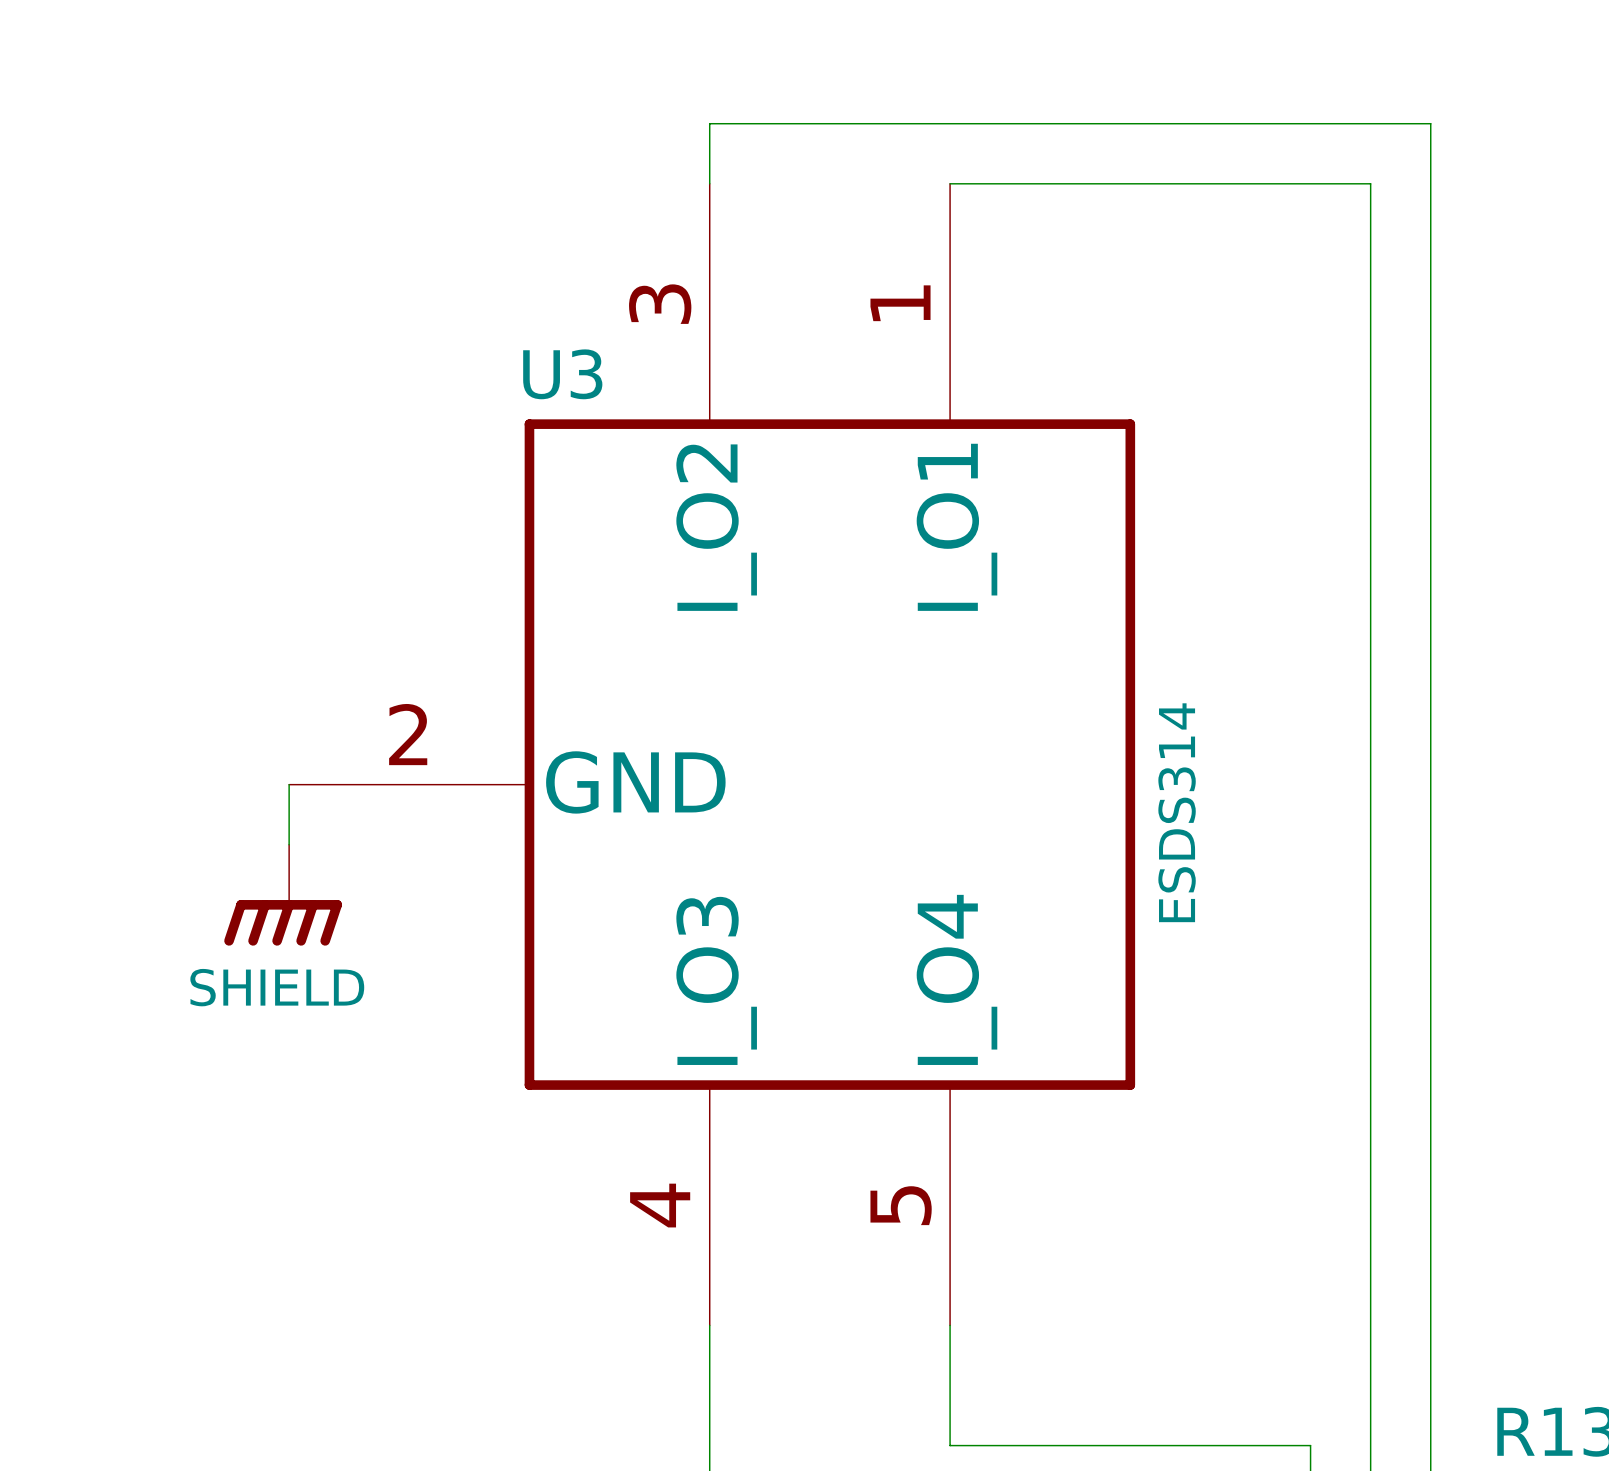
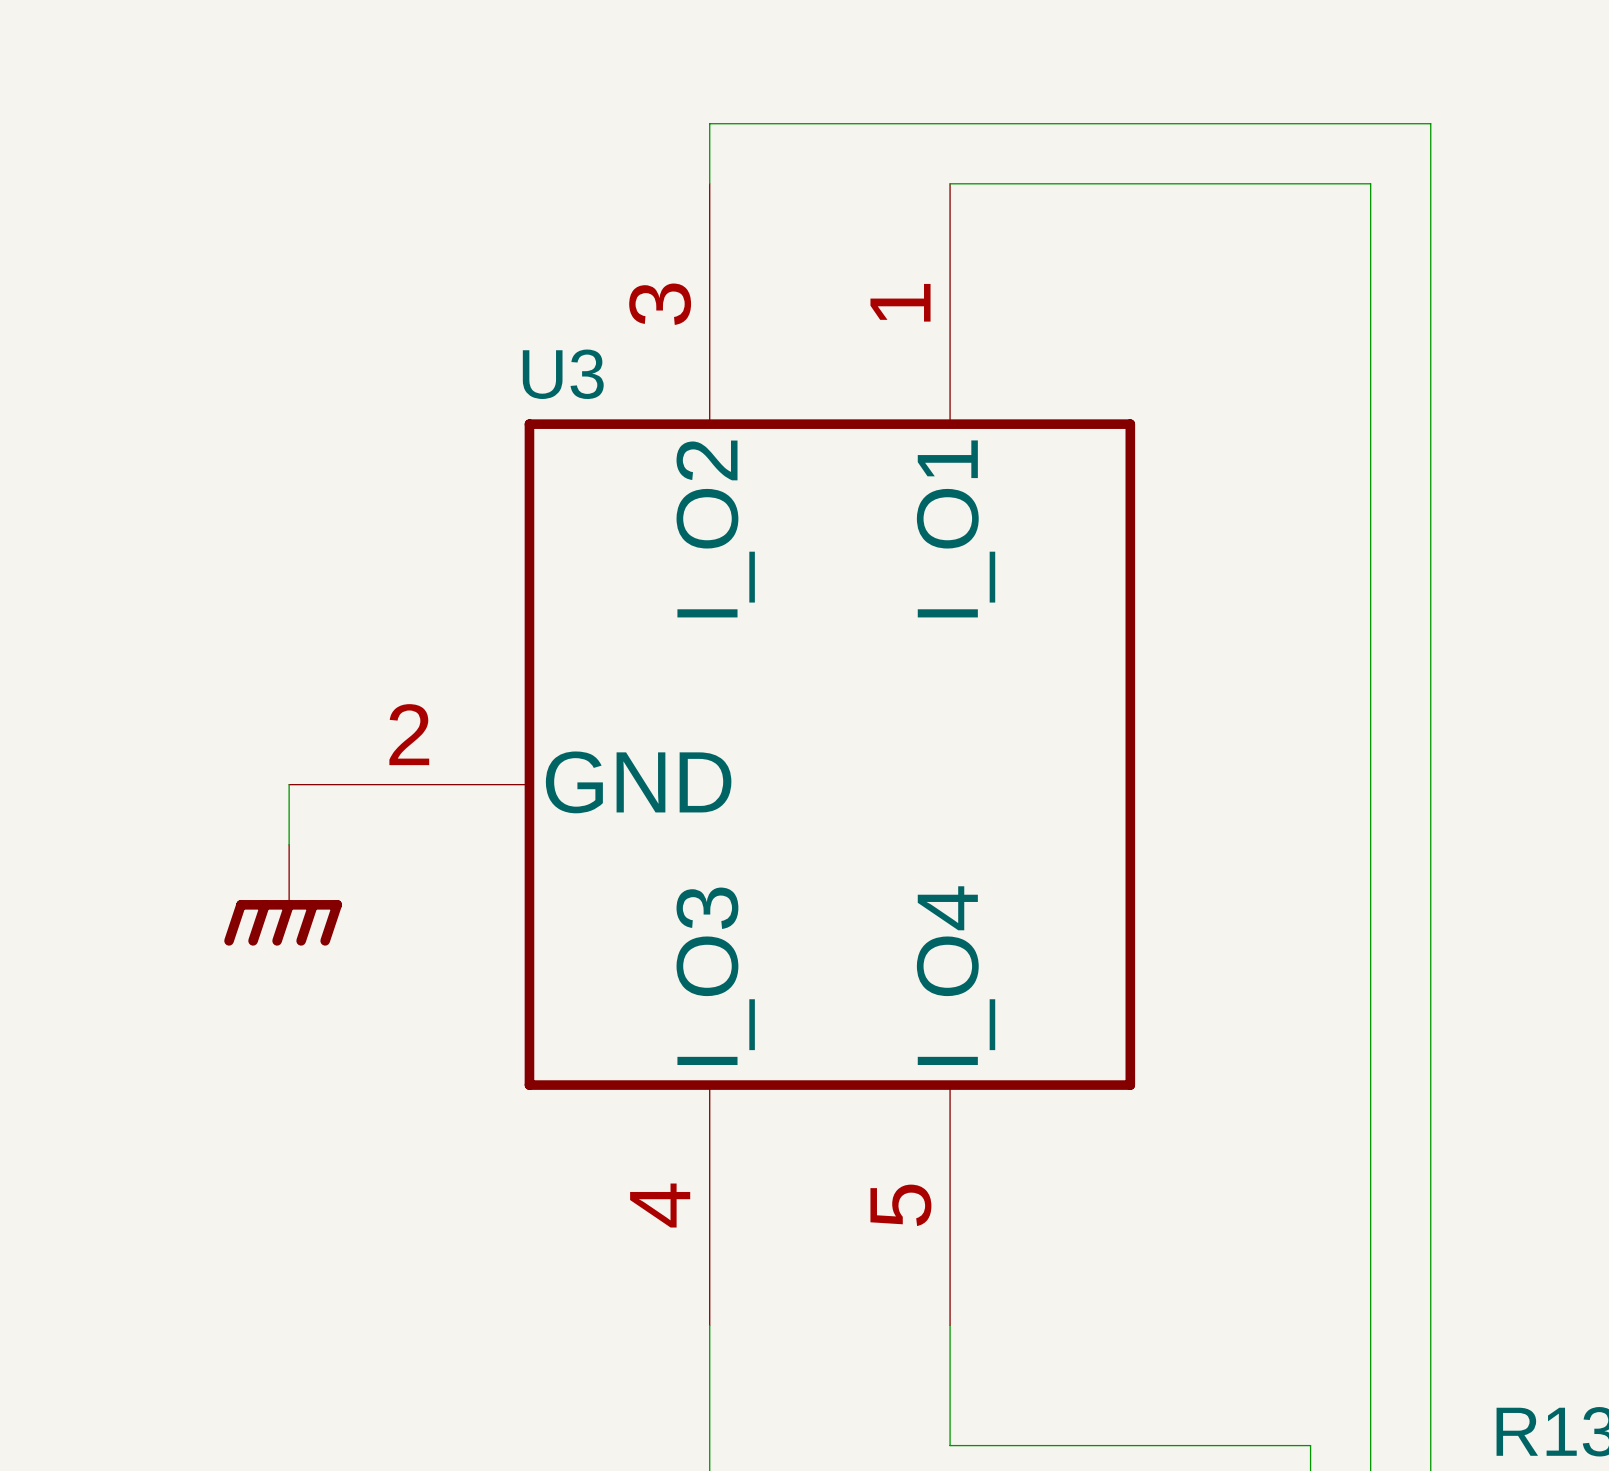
U3 value: ESDS314 (1177, 812) -> none
power symbol text: SHIELD (277, 987) -> none

